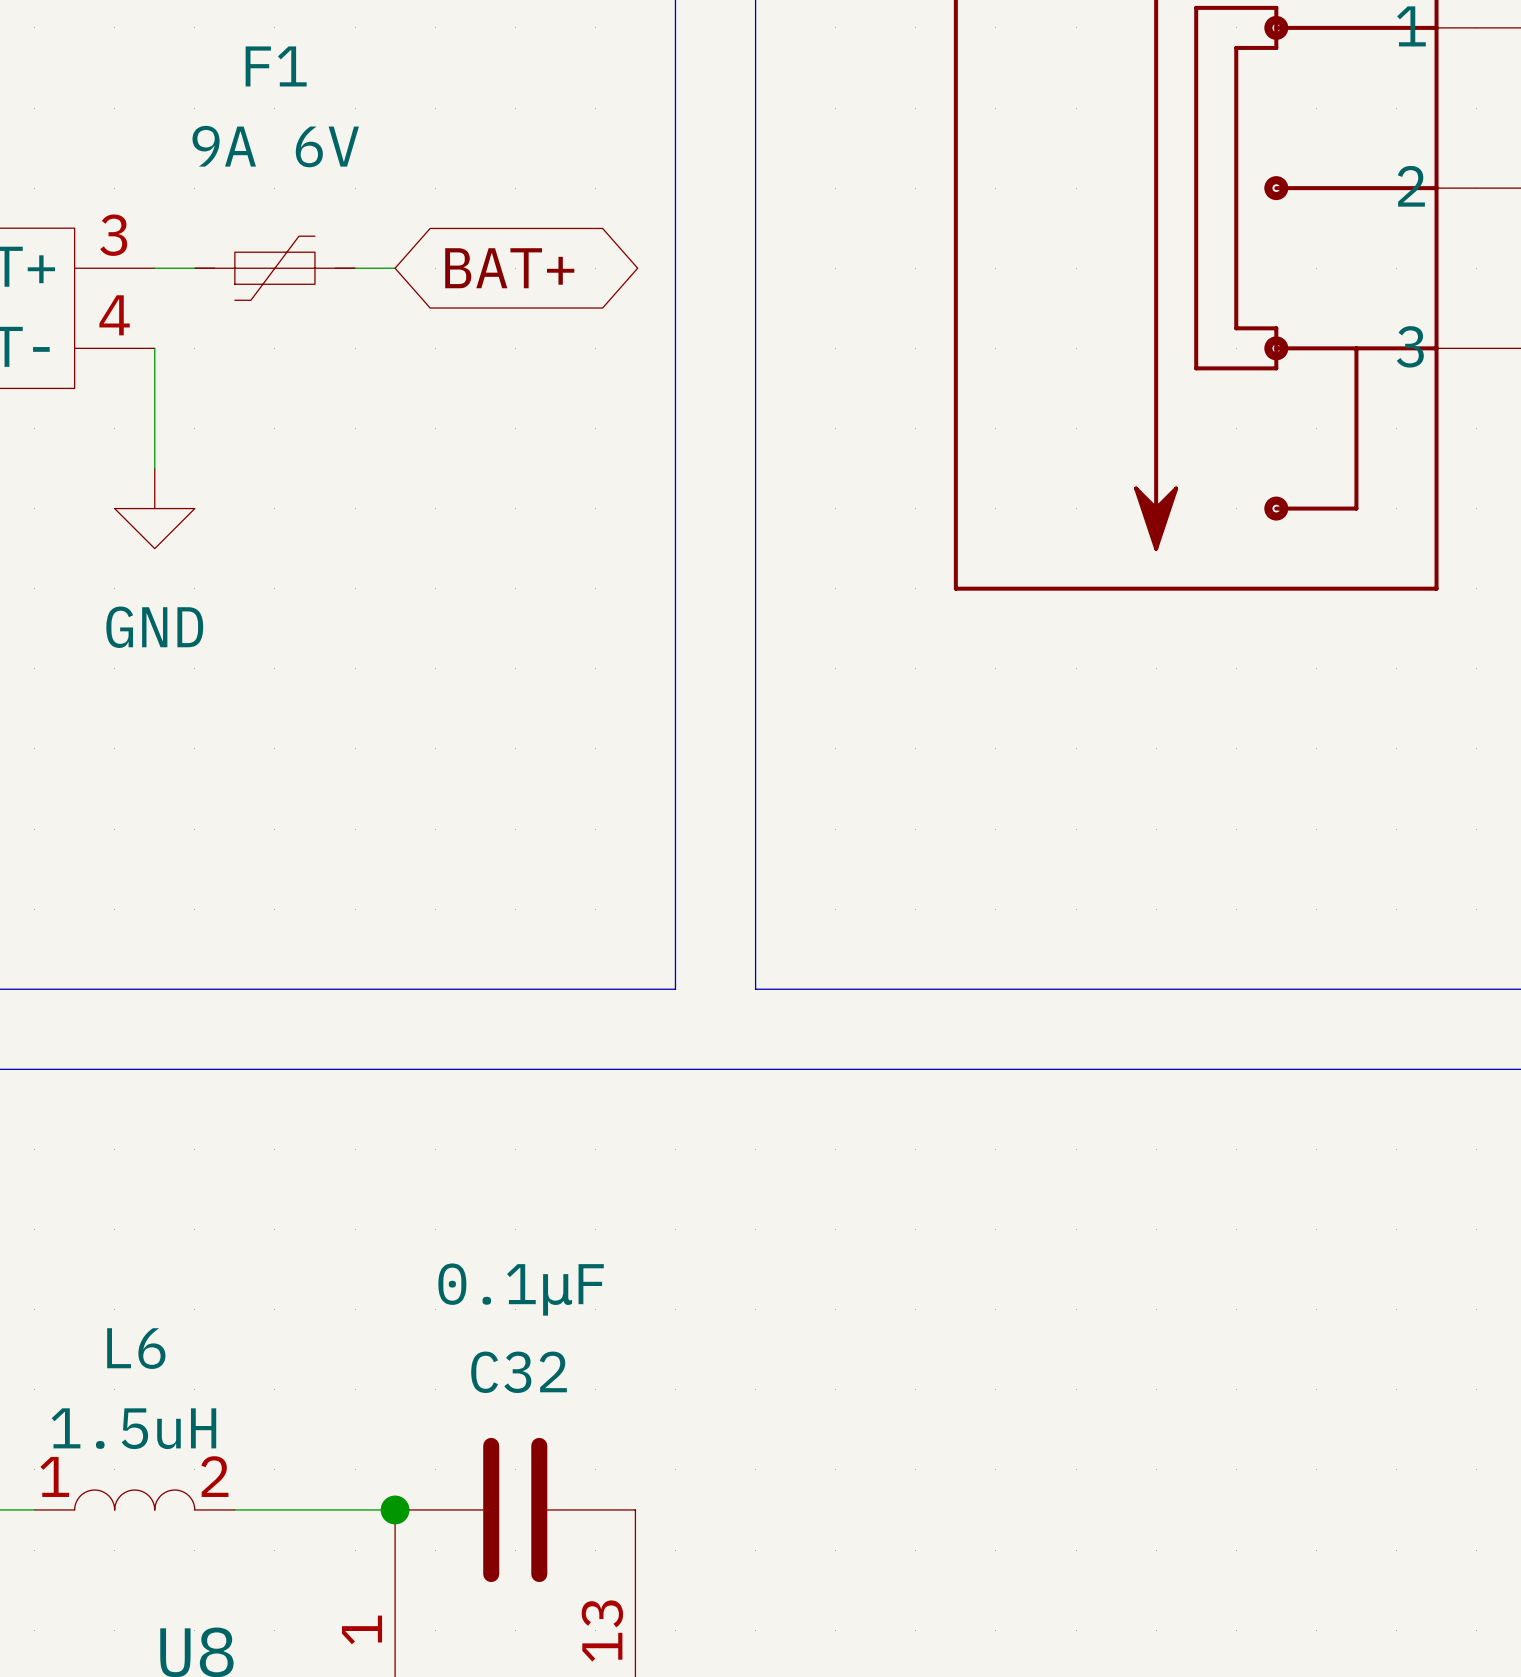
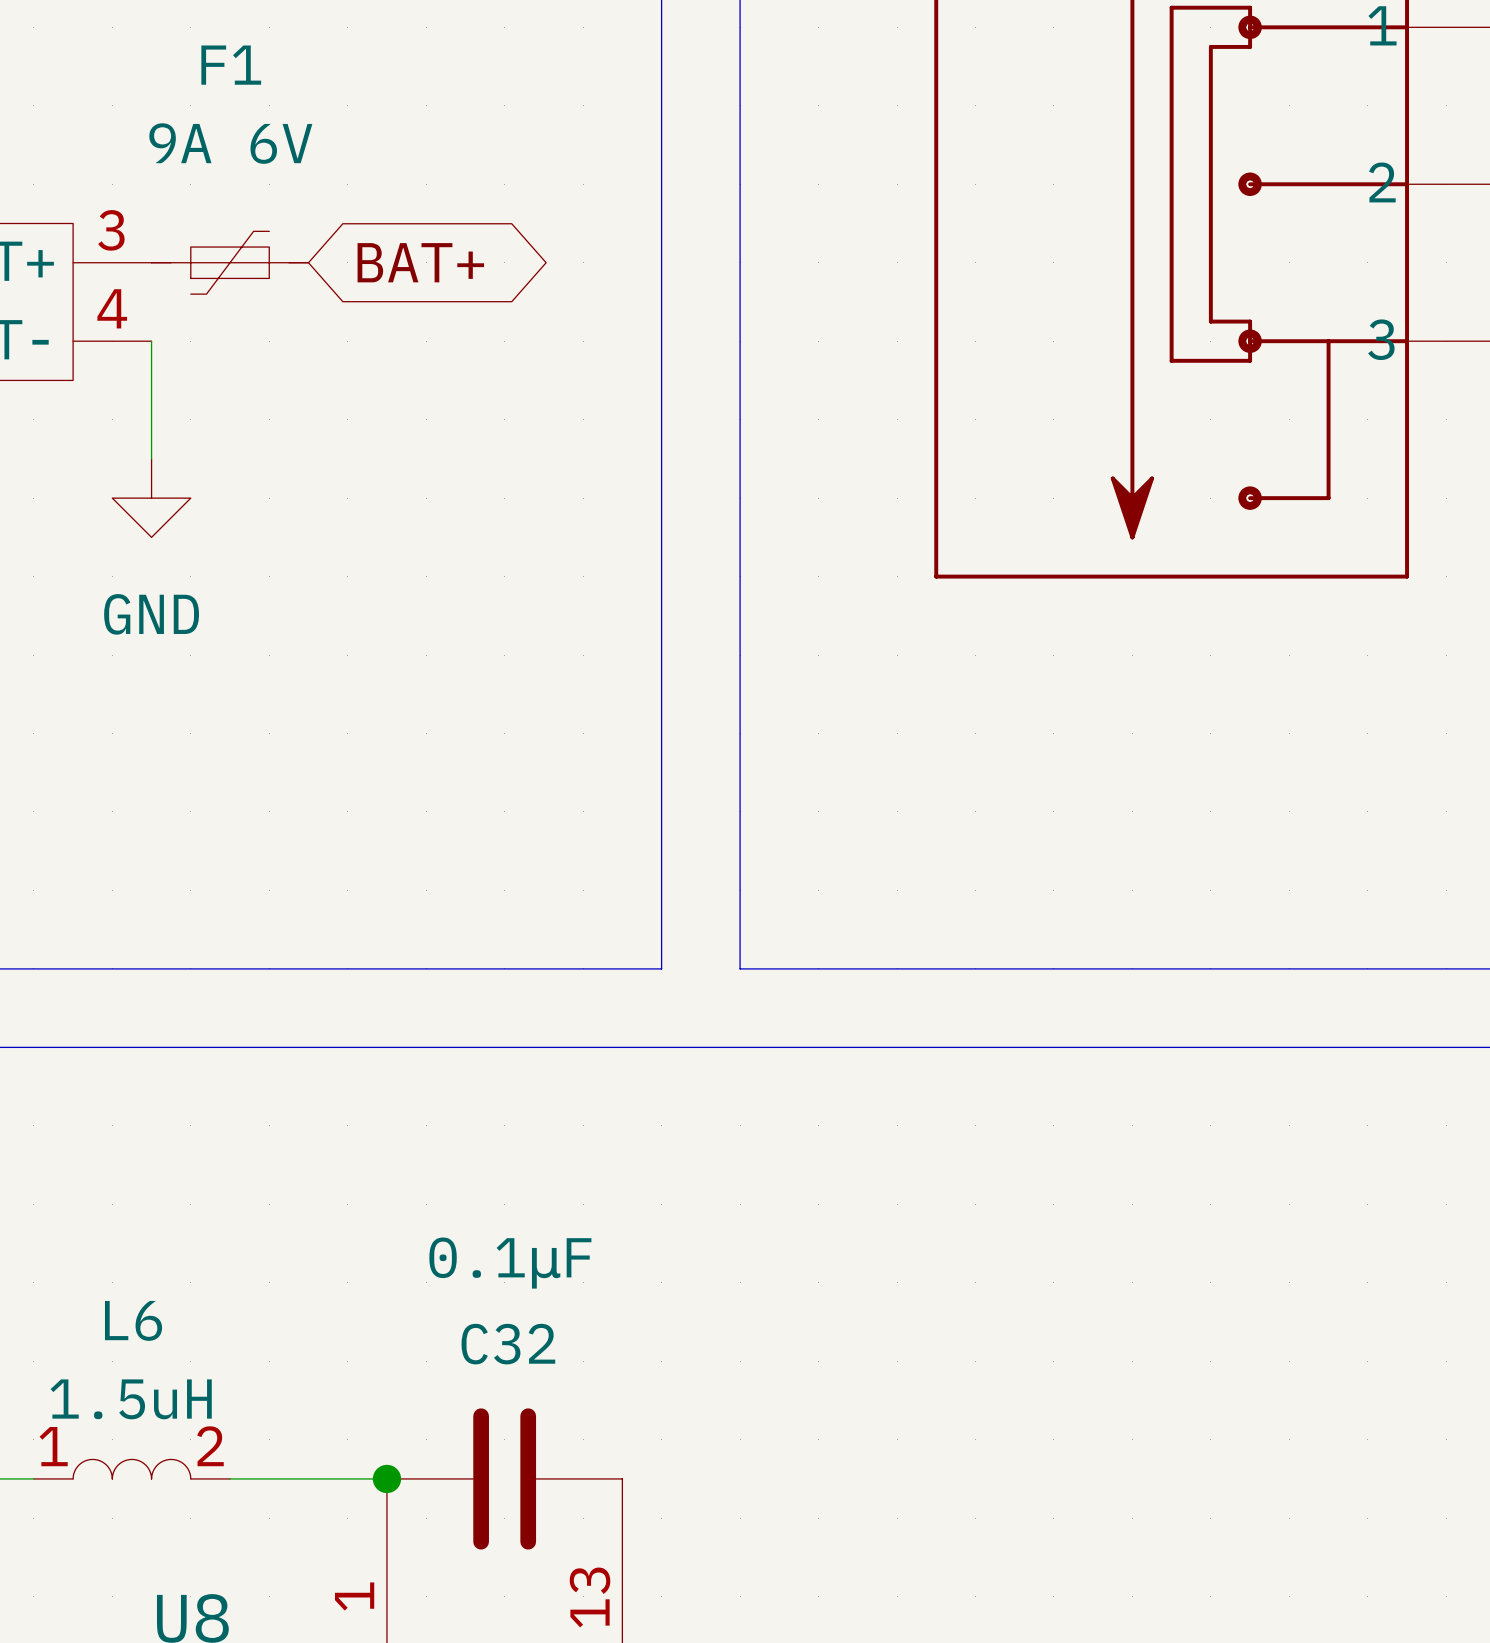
F1 position: (274, 268) -> (230, 262)
wire: (355, 268) (395, 268) -> none
global label position: BAT+ (509, 268) -> BAT+ (420, 262)

